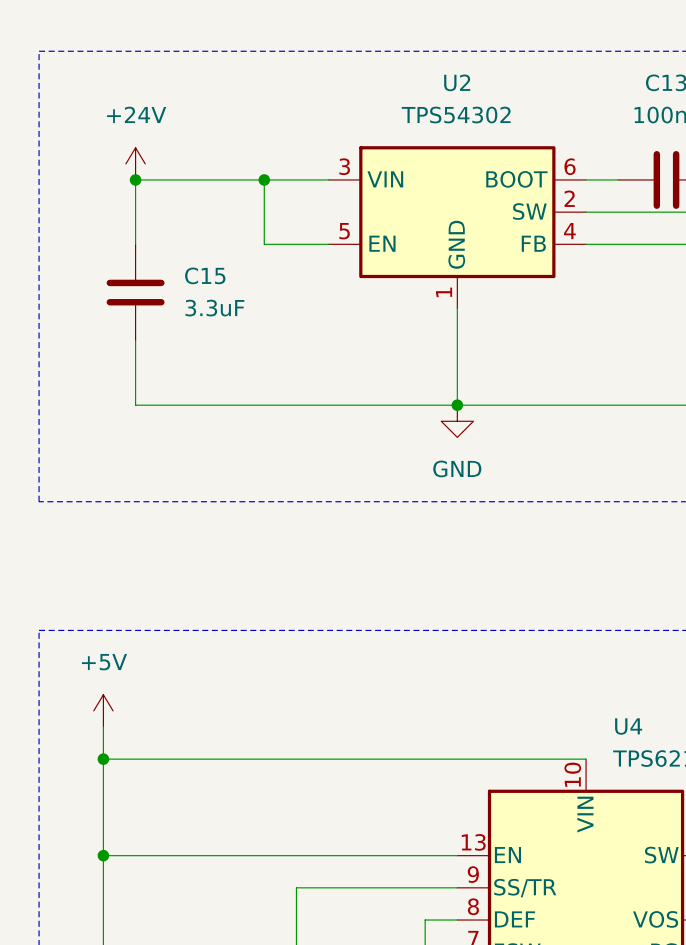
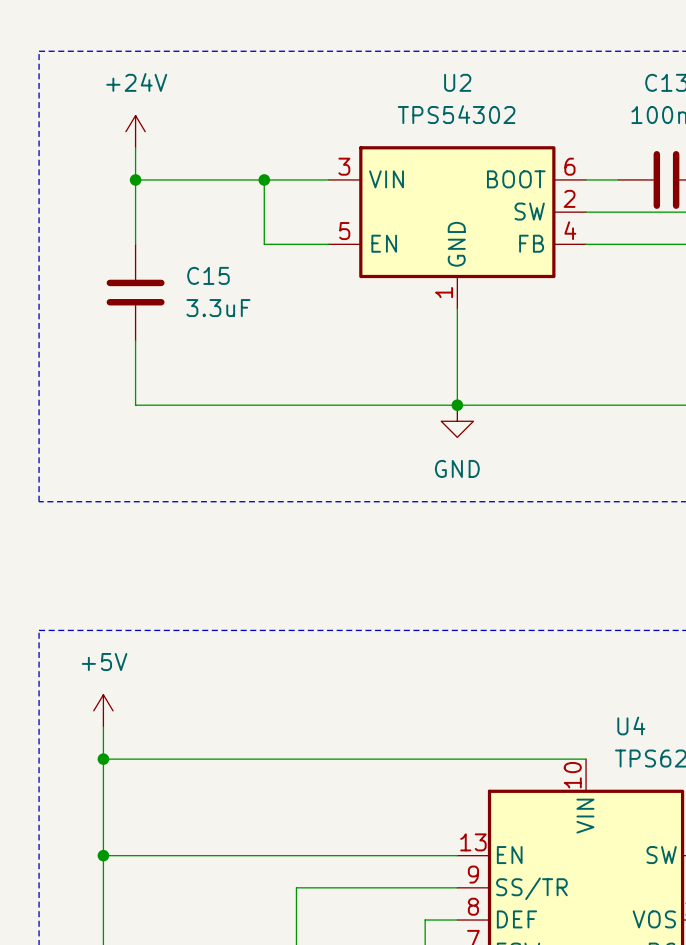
power symbol position: +24V (135, 163) -> +24V (135, 131)

